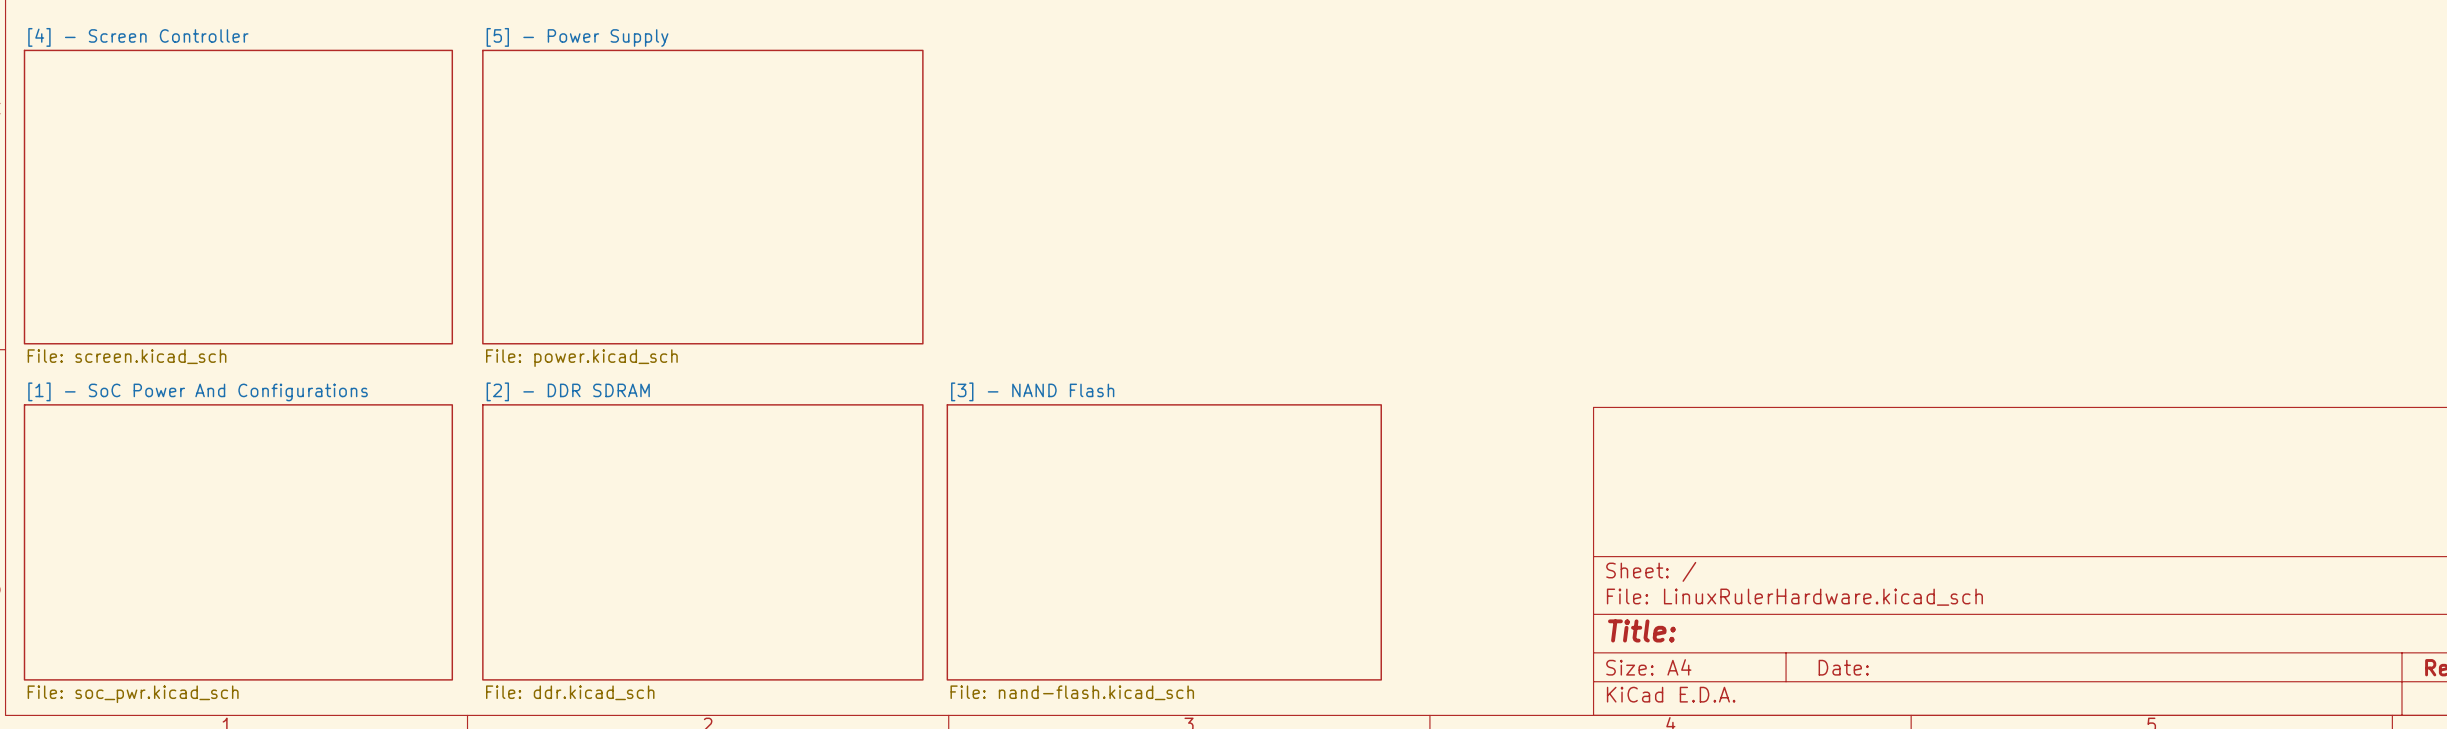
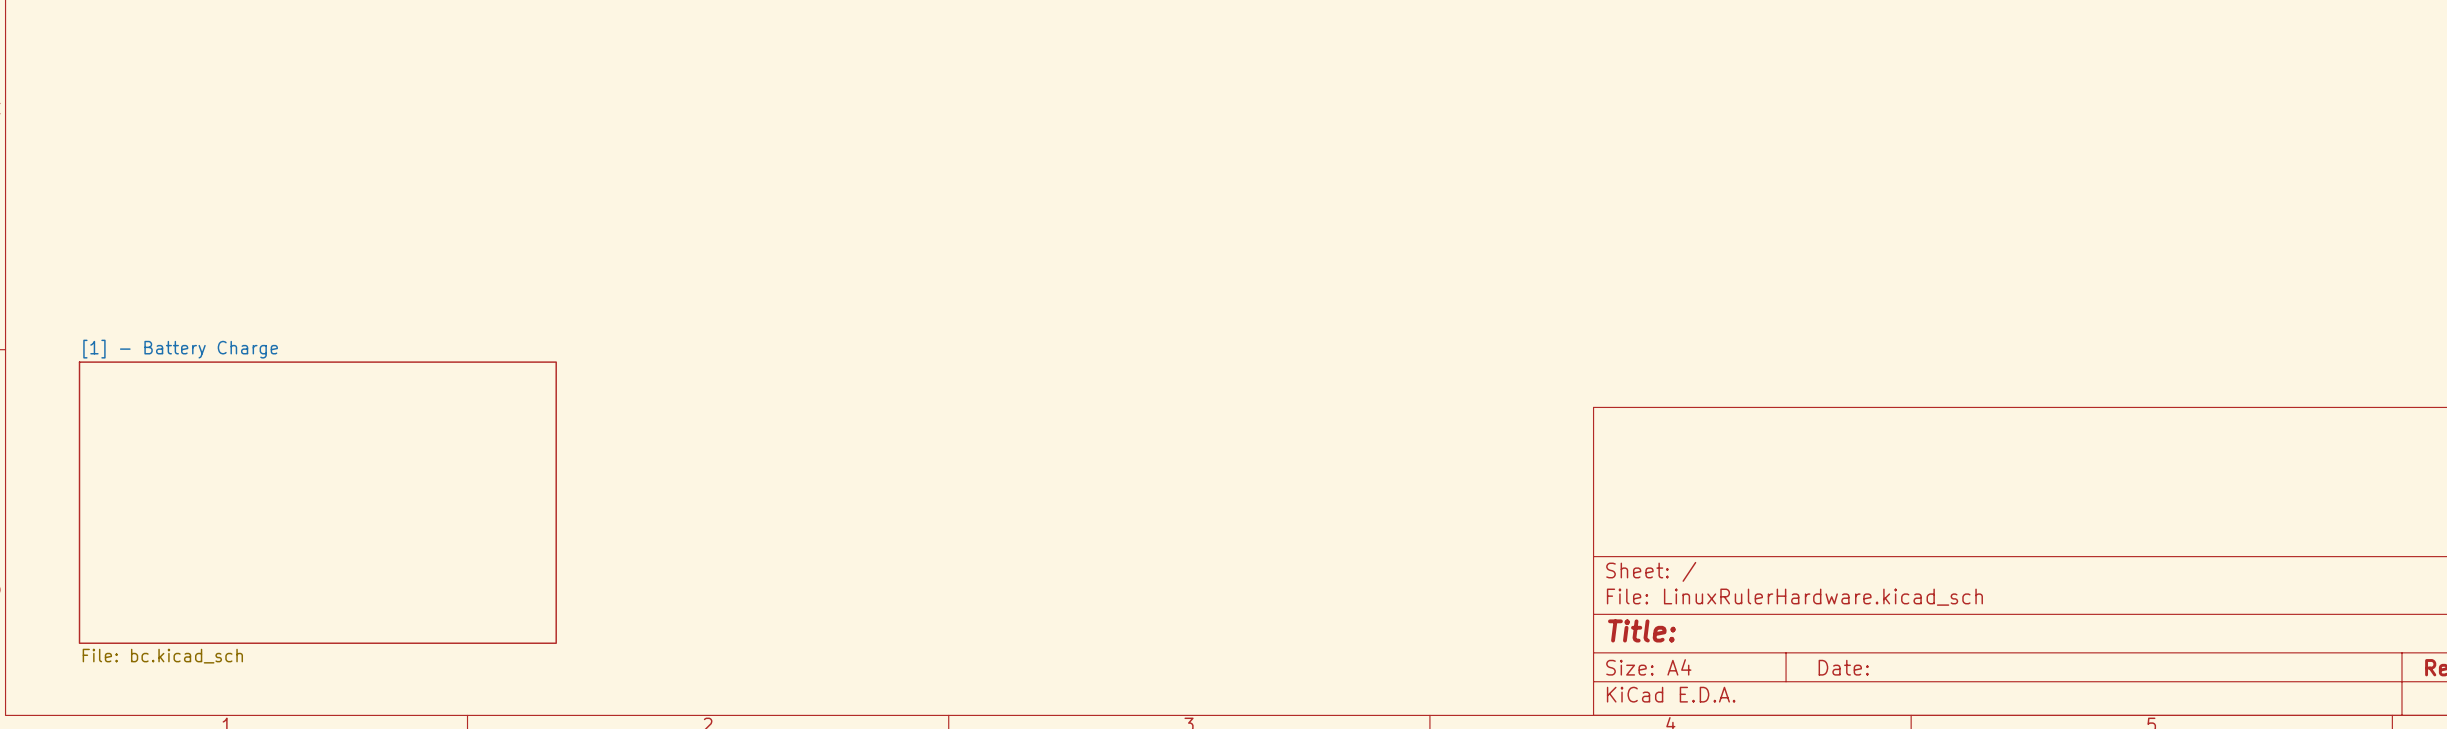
sheet [4] - Screen Controller: File: screen.kicad_sch (238, 197) -> none
sheet [5] - Power Supply: File: power.kicad_sch (702, 197) -> none
sheet [1] - Battery Charge: none -> File: bc.kicad_sch (317, 502)
sheet [1] - SoC Power And Configurations: File: soc_pwr.kicad_sch (238, 542) -> none
sheet [2] - DDR SDRAM: File: ddr.kicad_sch (702, 542) -> none
sheet [3] - NAND Flash: File: nand-flash.kicad_sch (1164, 542) -> none

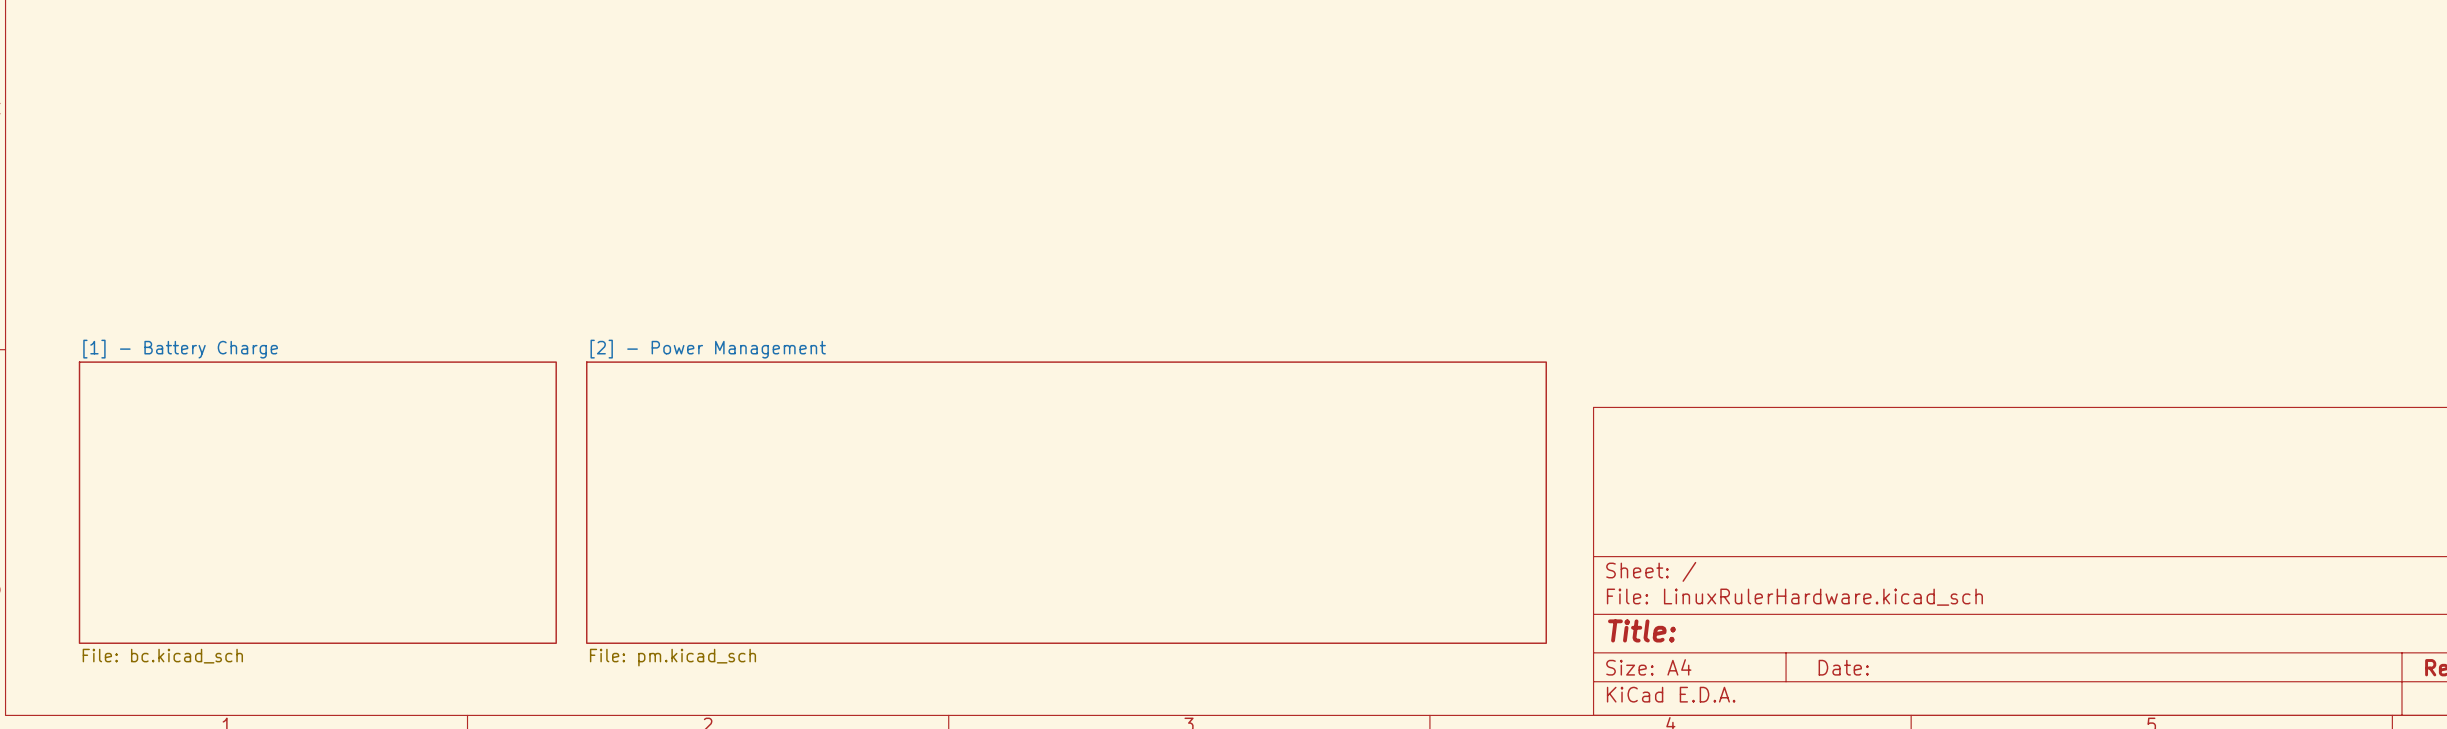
sheet [2] - Power Management: none -> File: pm.kicad_sch (1066, 502)

